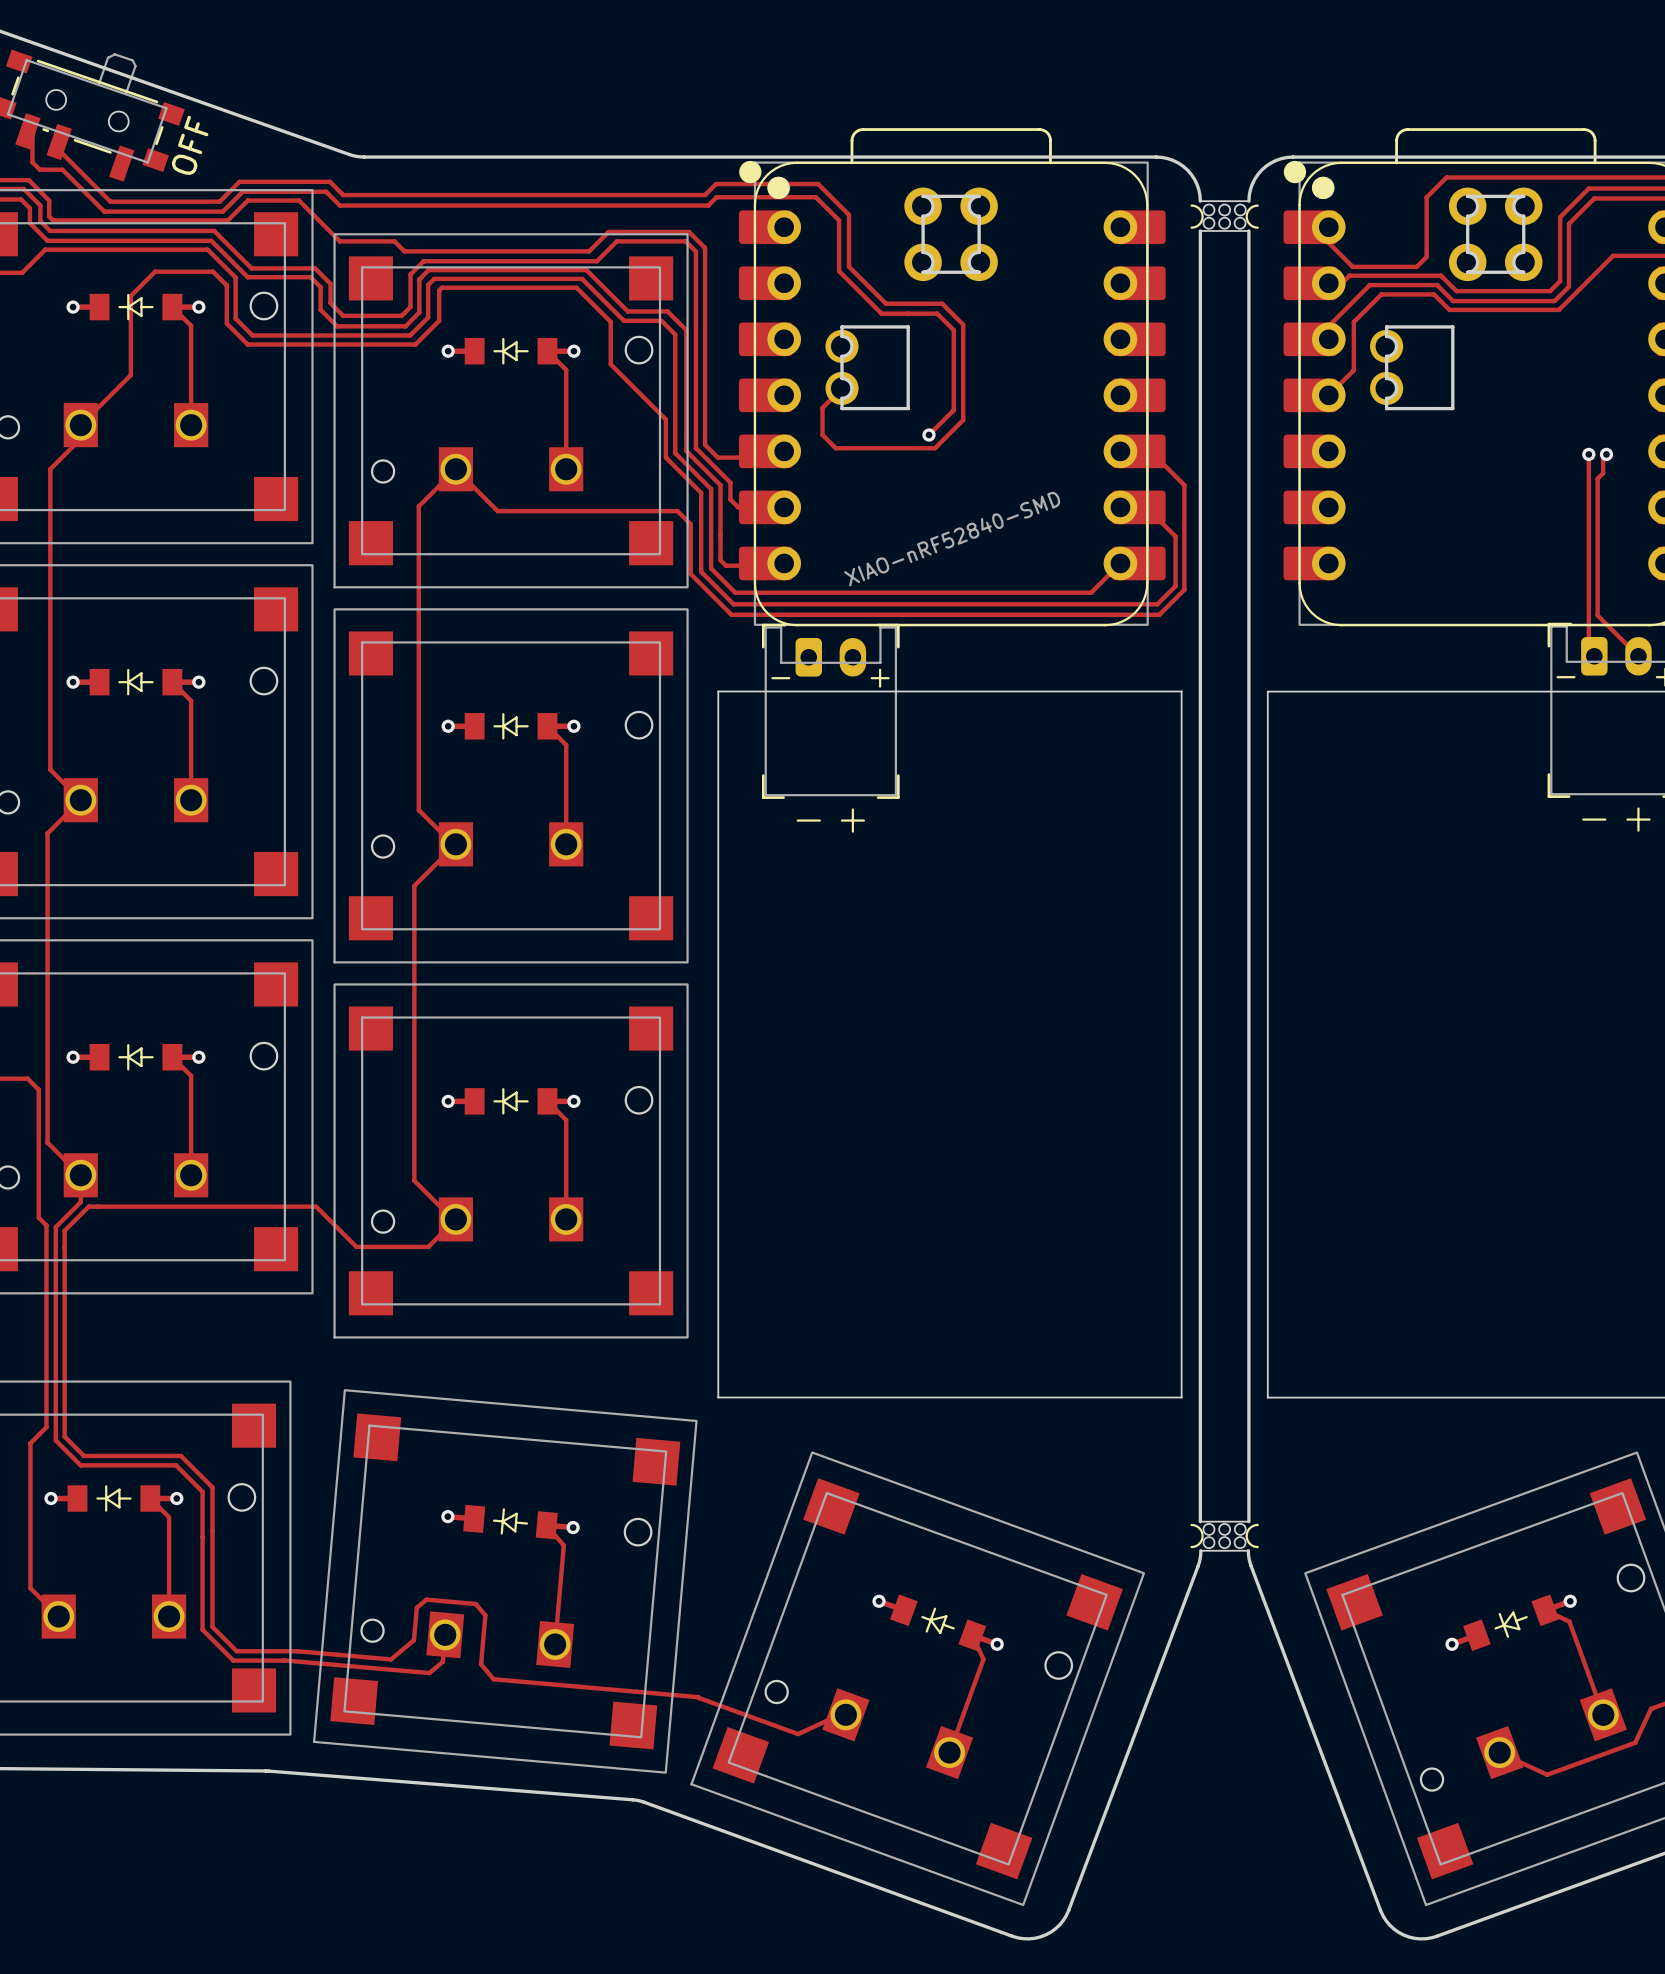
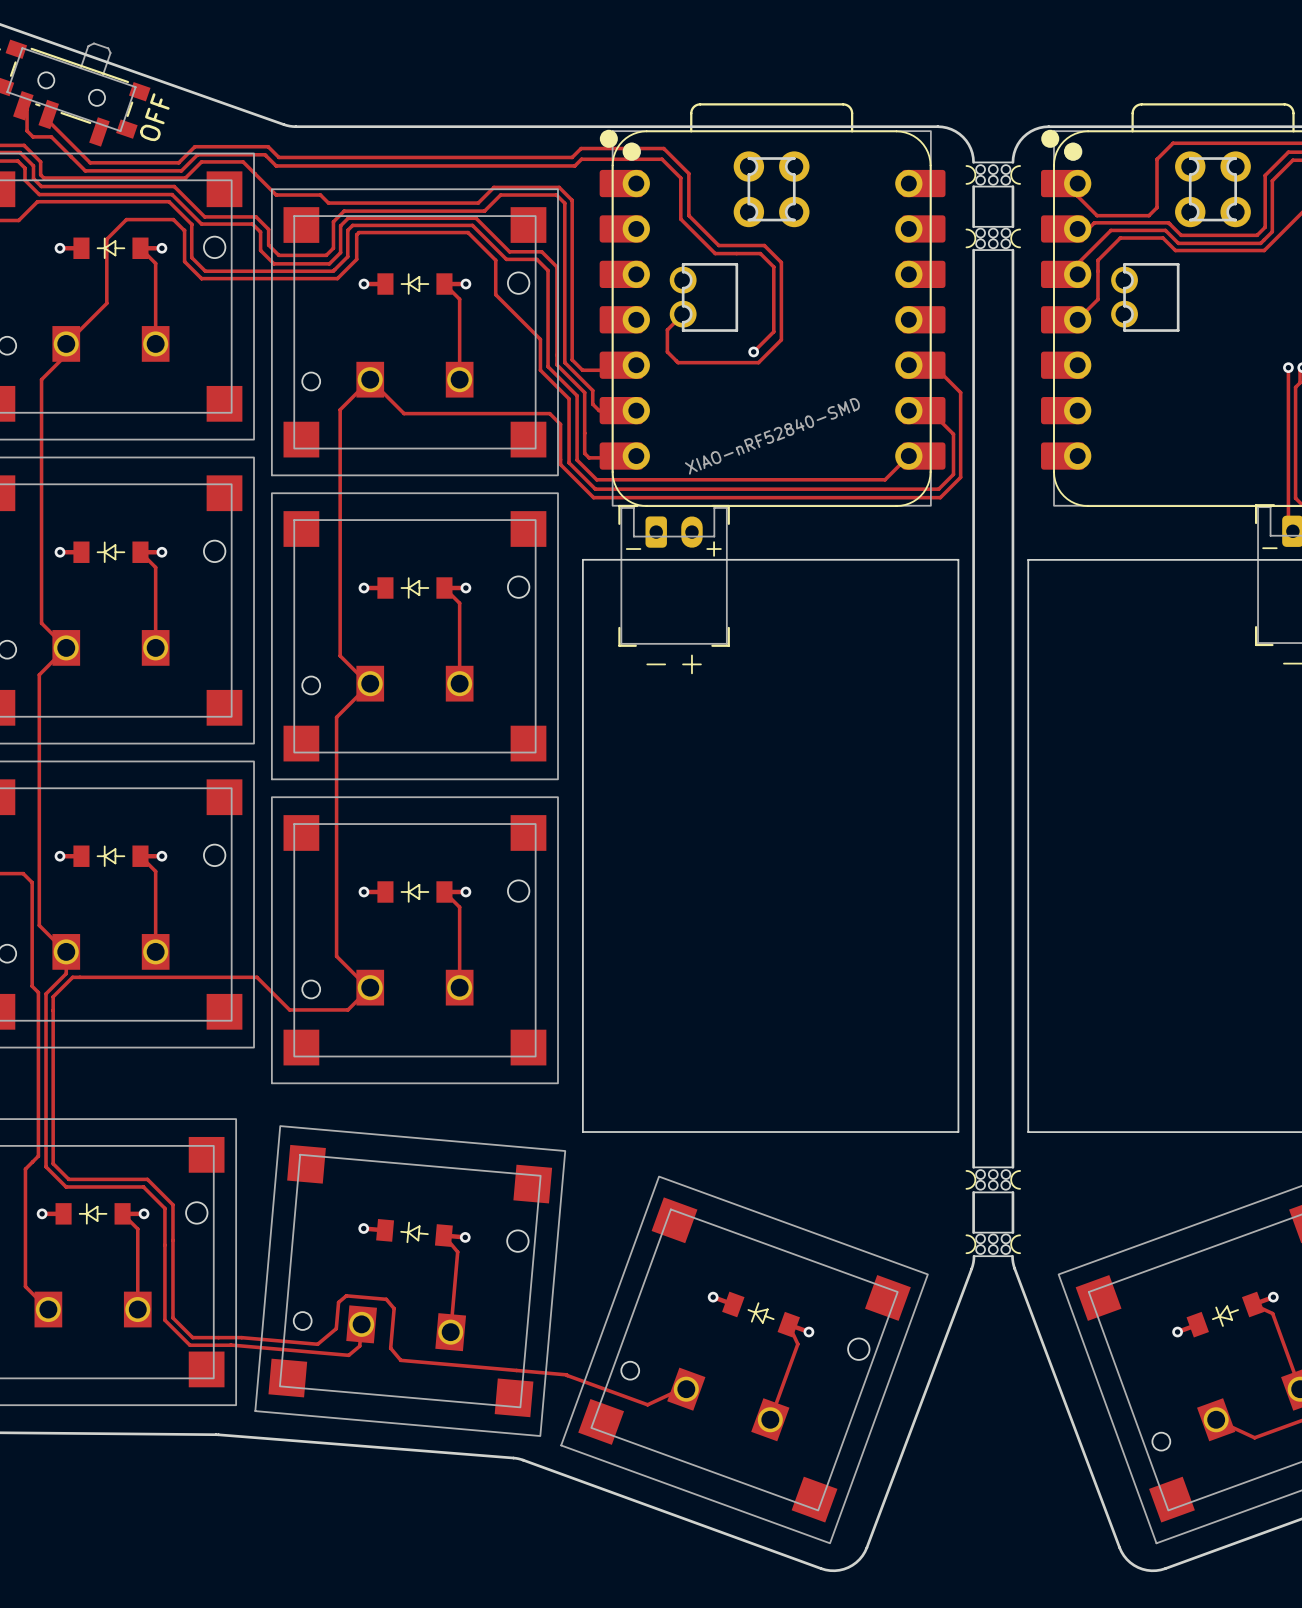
board edge: (1200, 280) (1200, 309) -> (973, 226) (1012, 226)
board edge: (1248, 280) (1248, 309) -> (973, 250) (1012, 250)
part: none -> (993, 238)
board edge: (1200, 1441) (1200, 1472) -> (973, 1167) (1012, 1167)
board edge: (1248, 1441) (1248, 1472) -> (973, 1192) (1012, 1192)
part: none -> (993, 1179)

